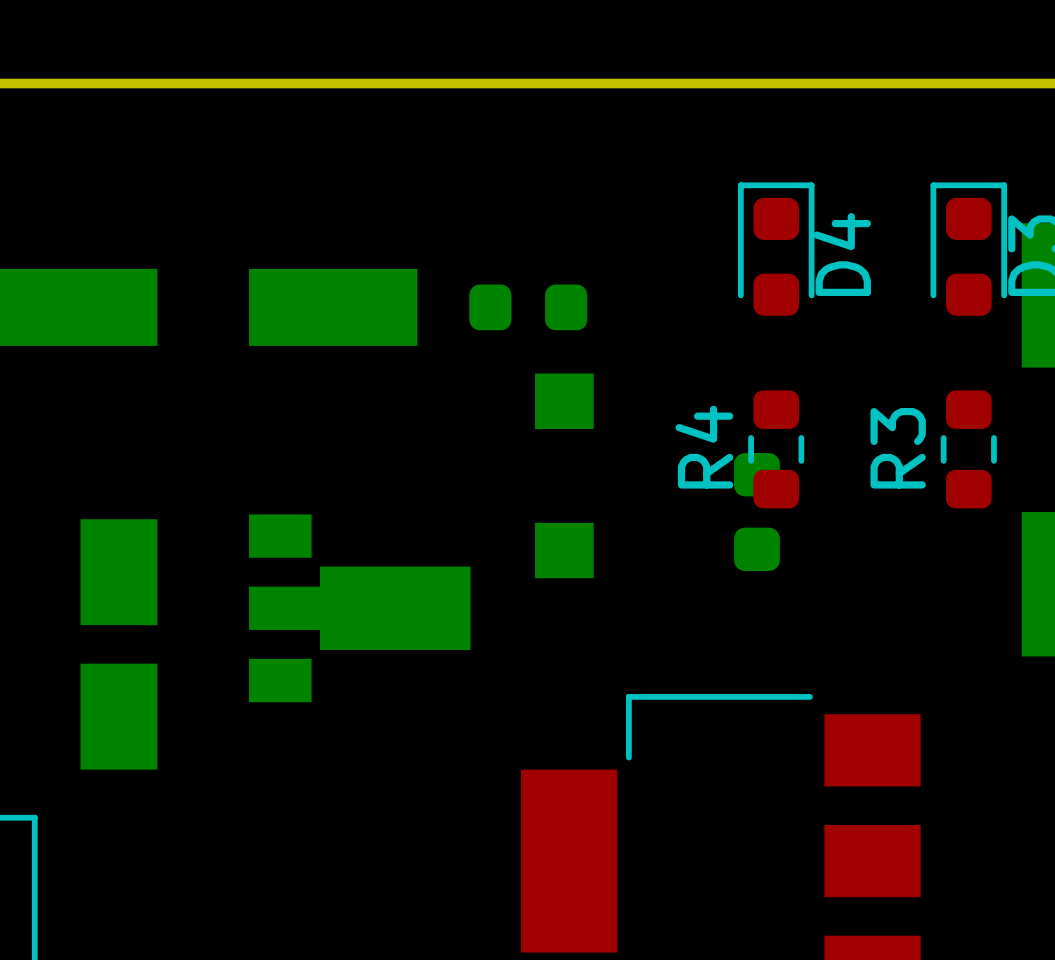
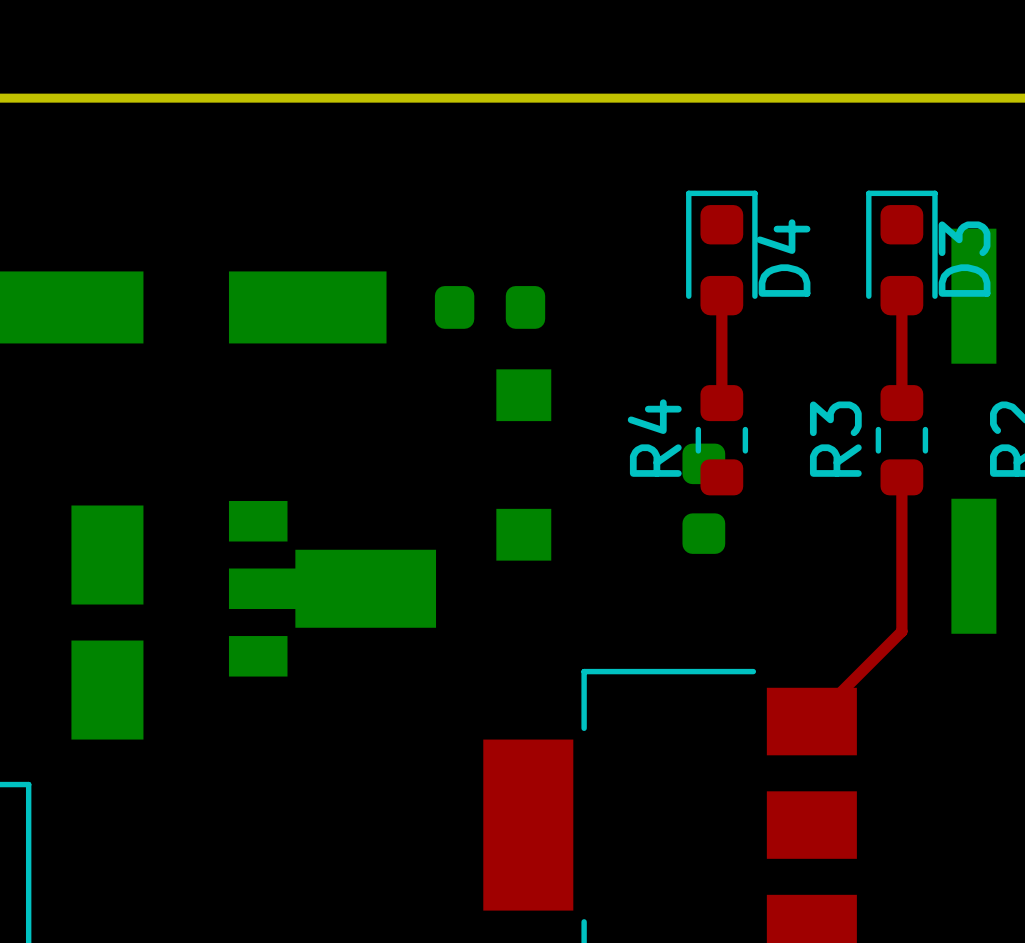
top track: none -> (721, 295) (721, 403)
top track: none -> (901, 295) (901, 403)
top track: none -> (901, 477) (901, 631) (811, 721)

